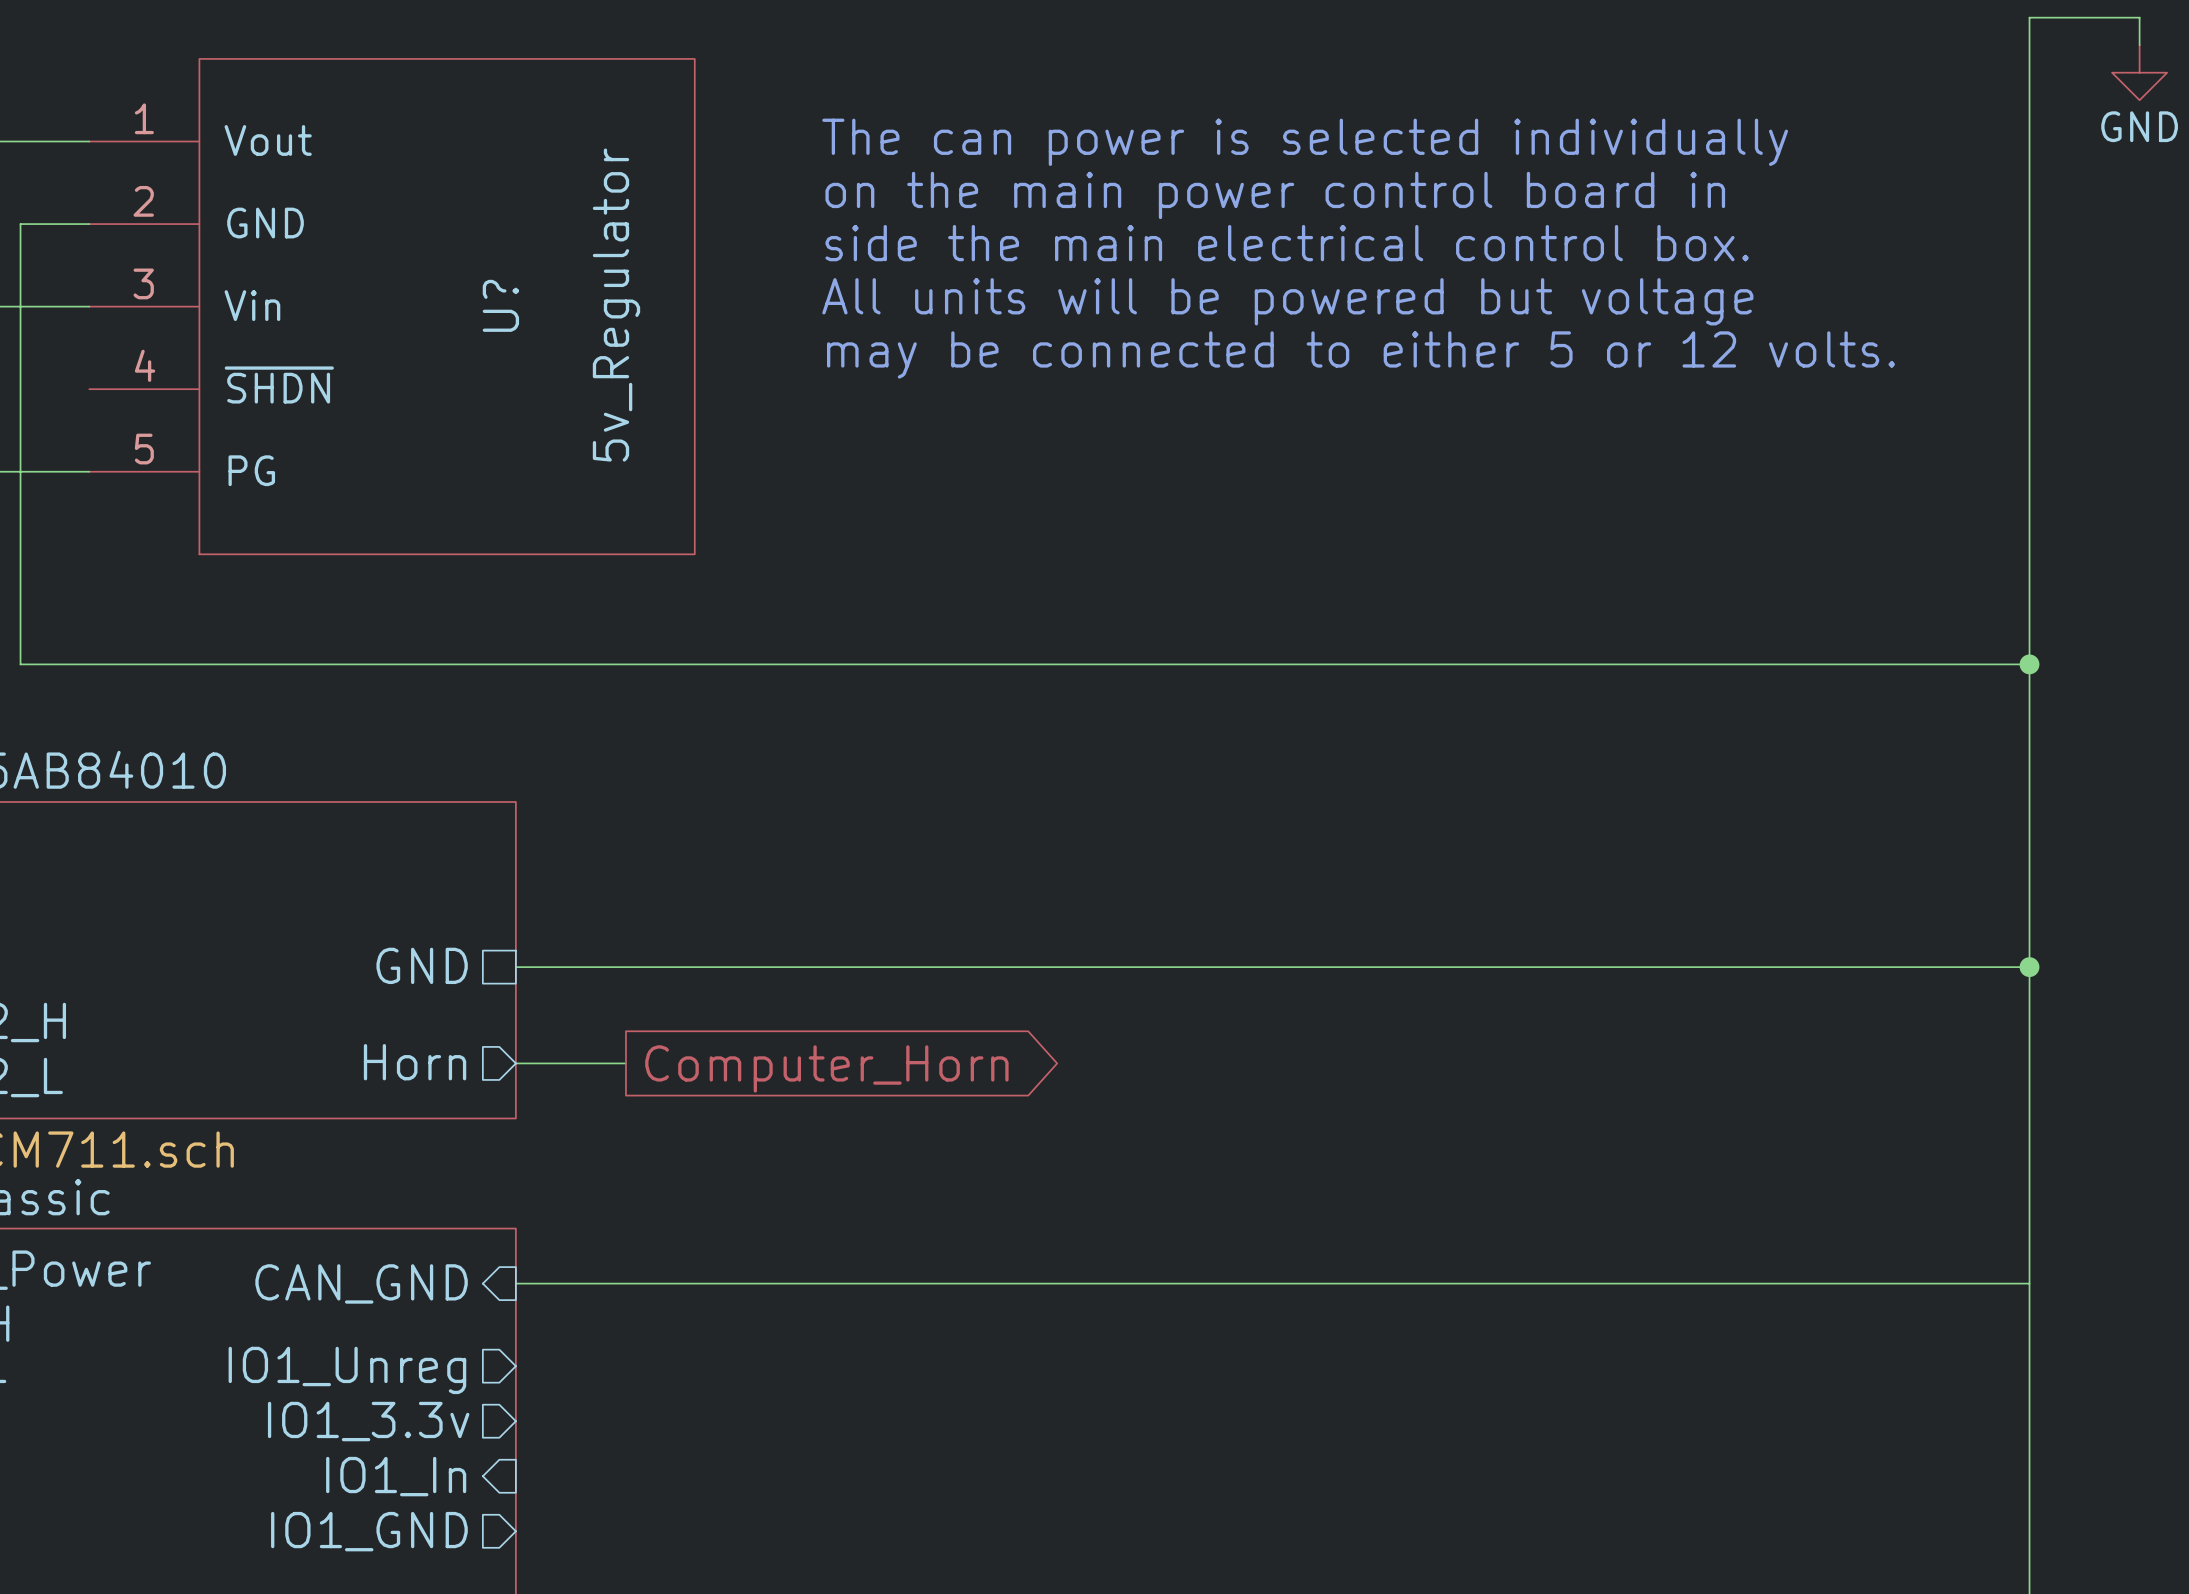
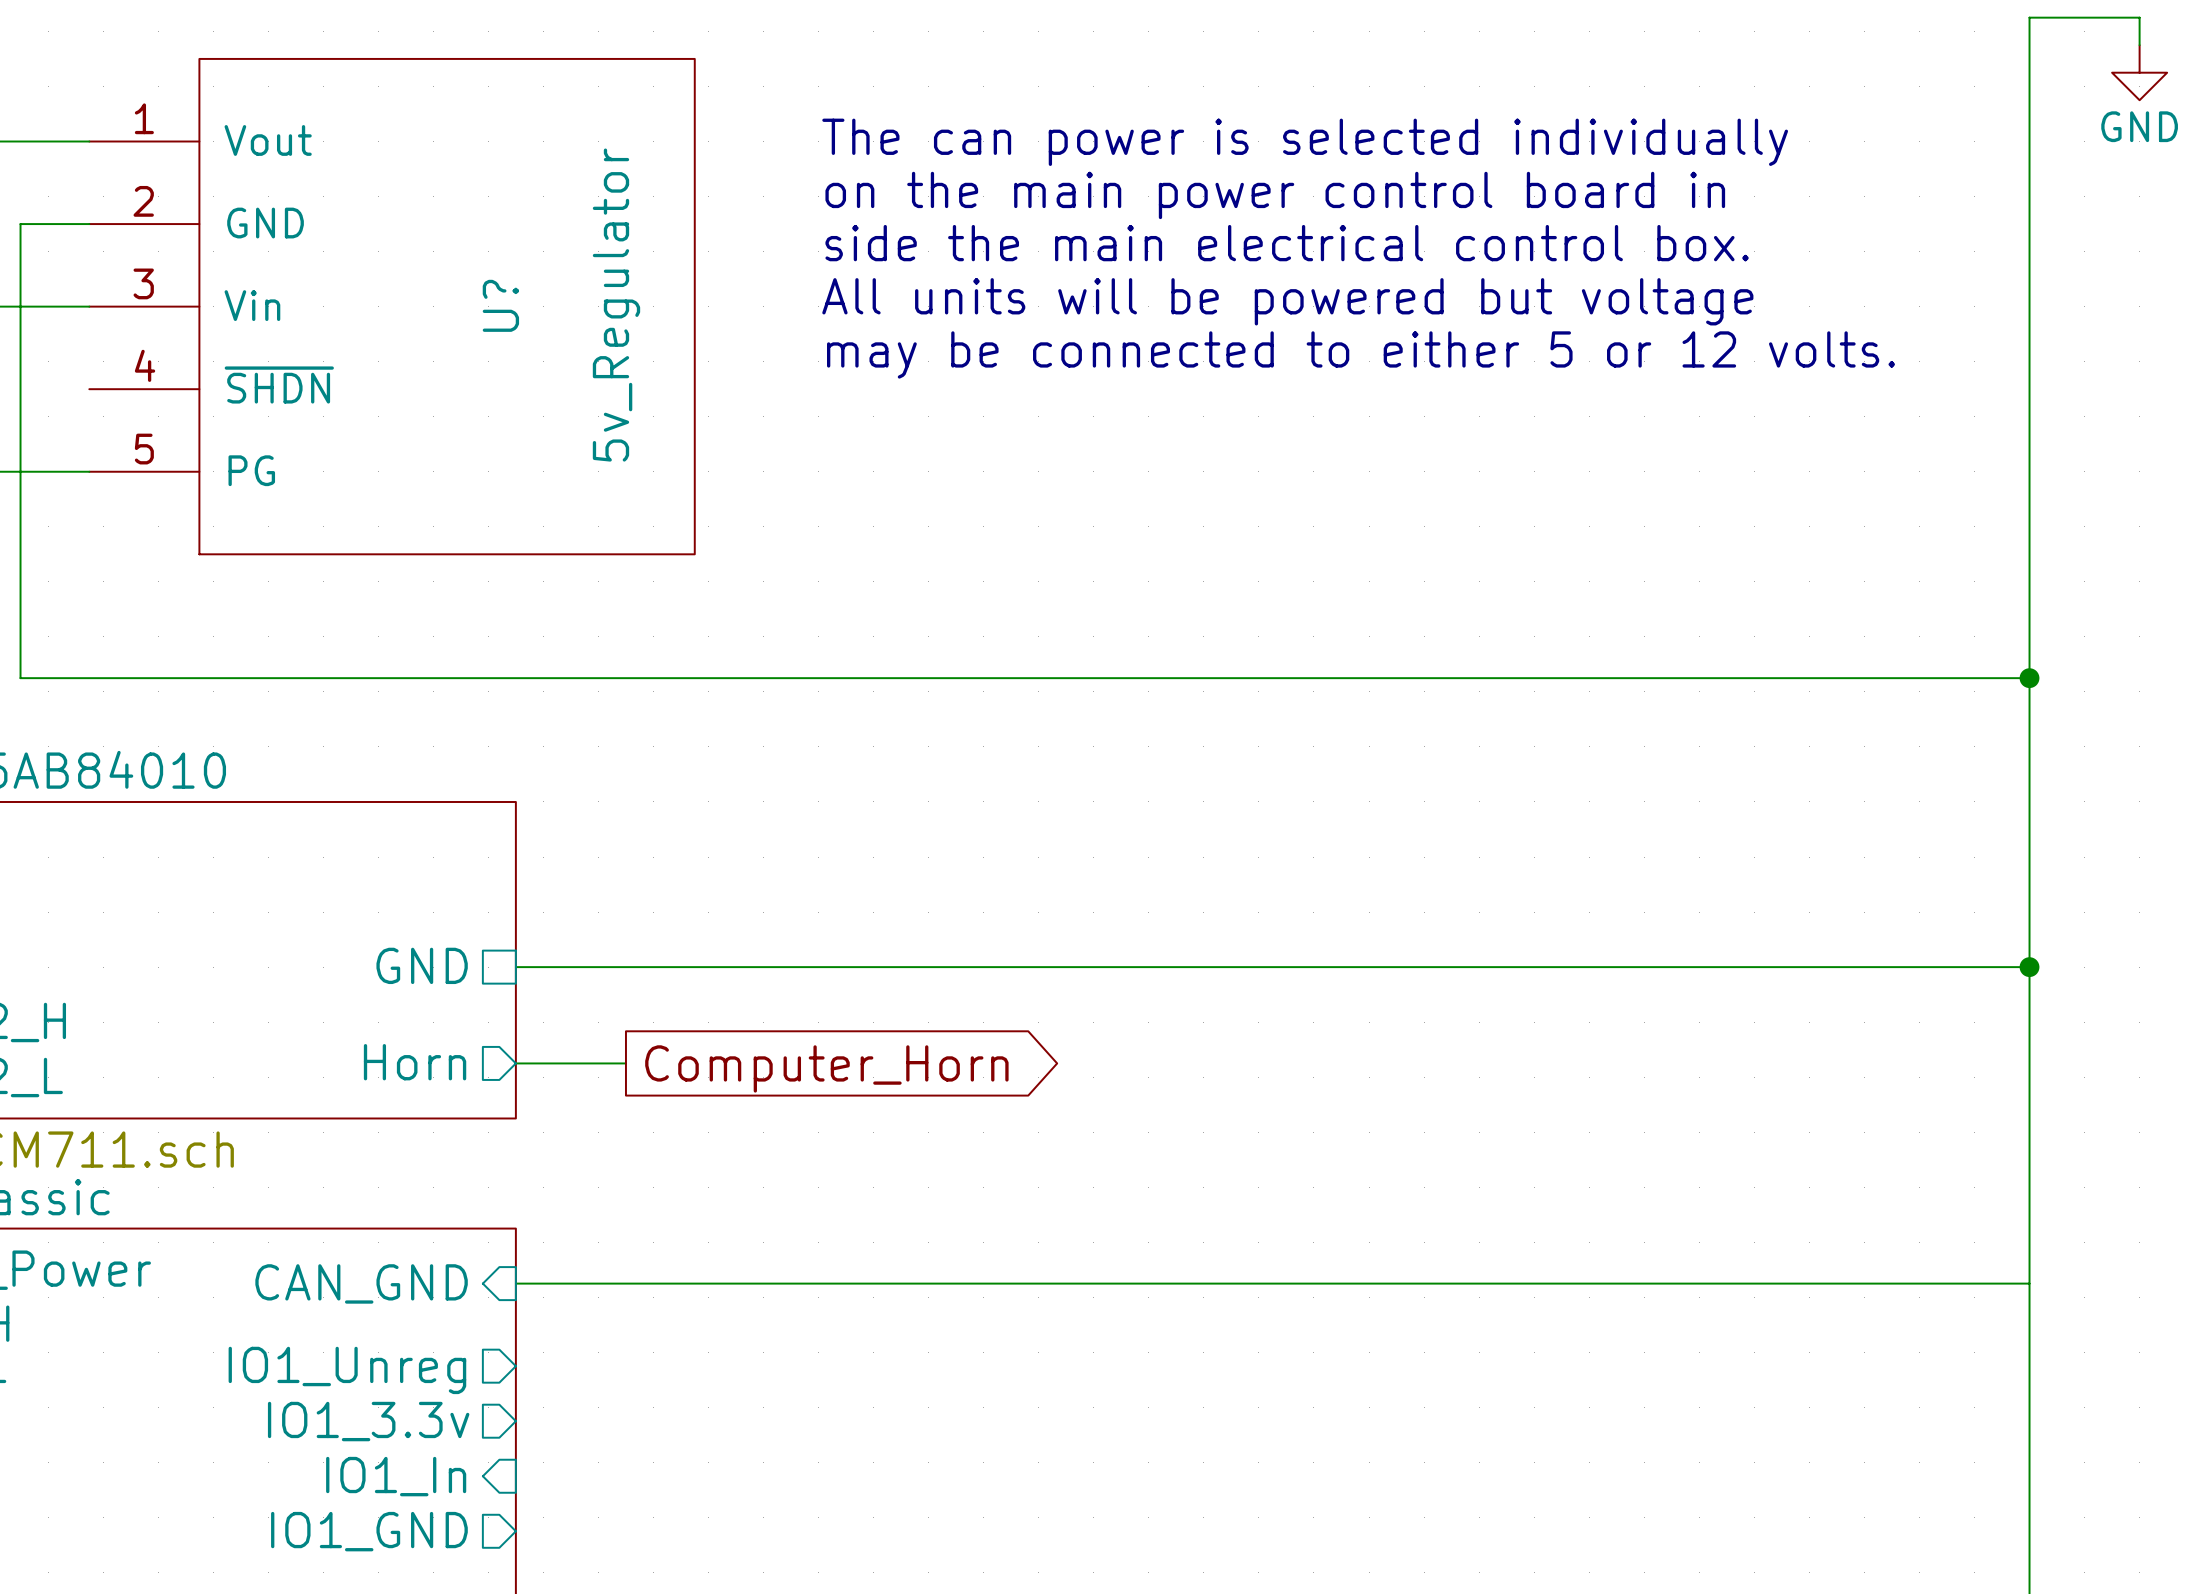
wire: (20, 664) (2029, 664) -> (20, 664) (20, 678) (2029, 678)
junction position: (2029, 664) -> (2029, 678)

